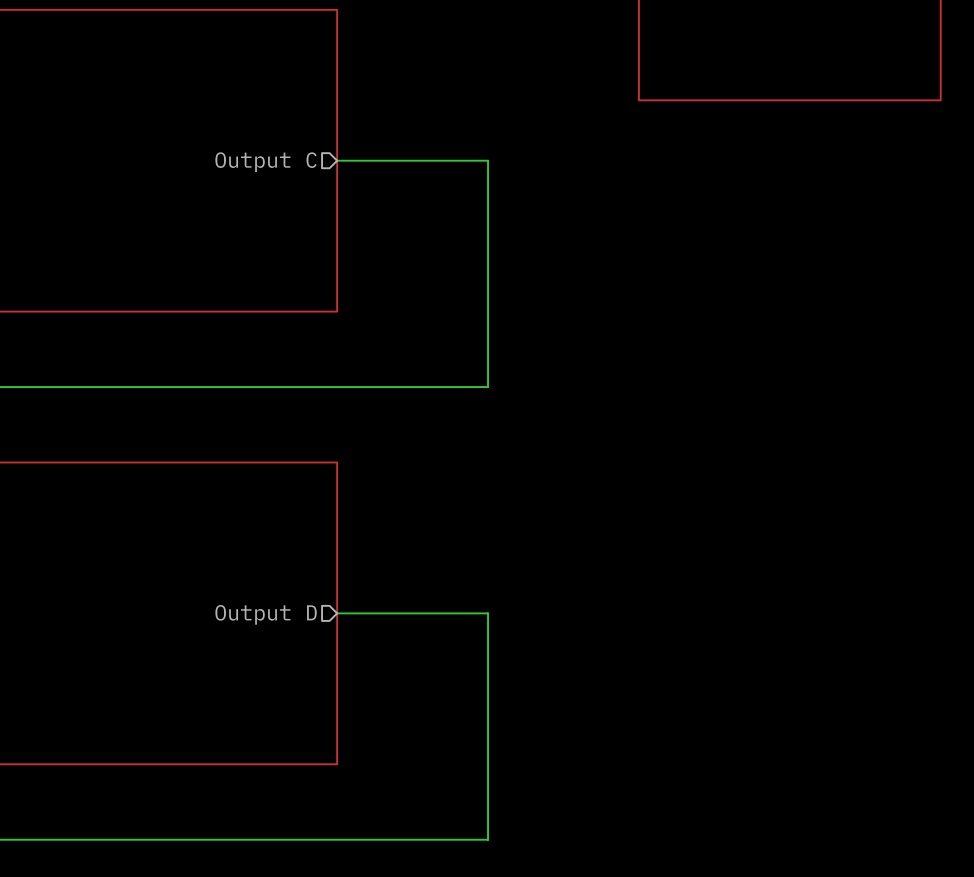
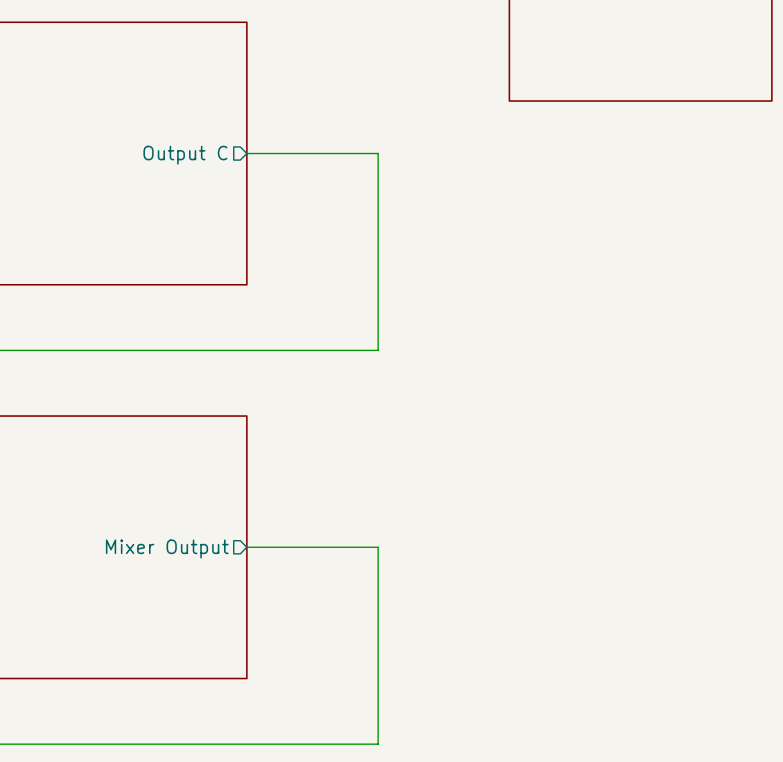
sheet pin: Output D (266, 614) -> Mixer Output (167, 548)

